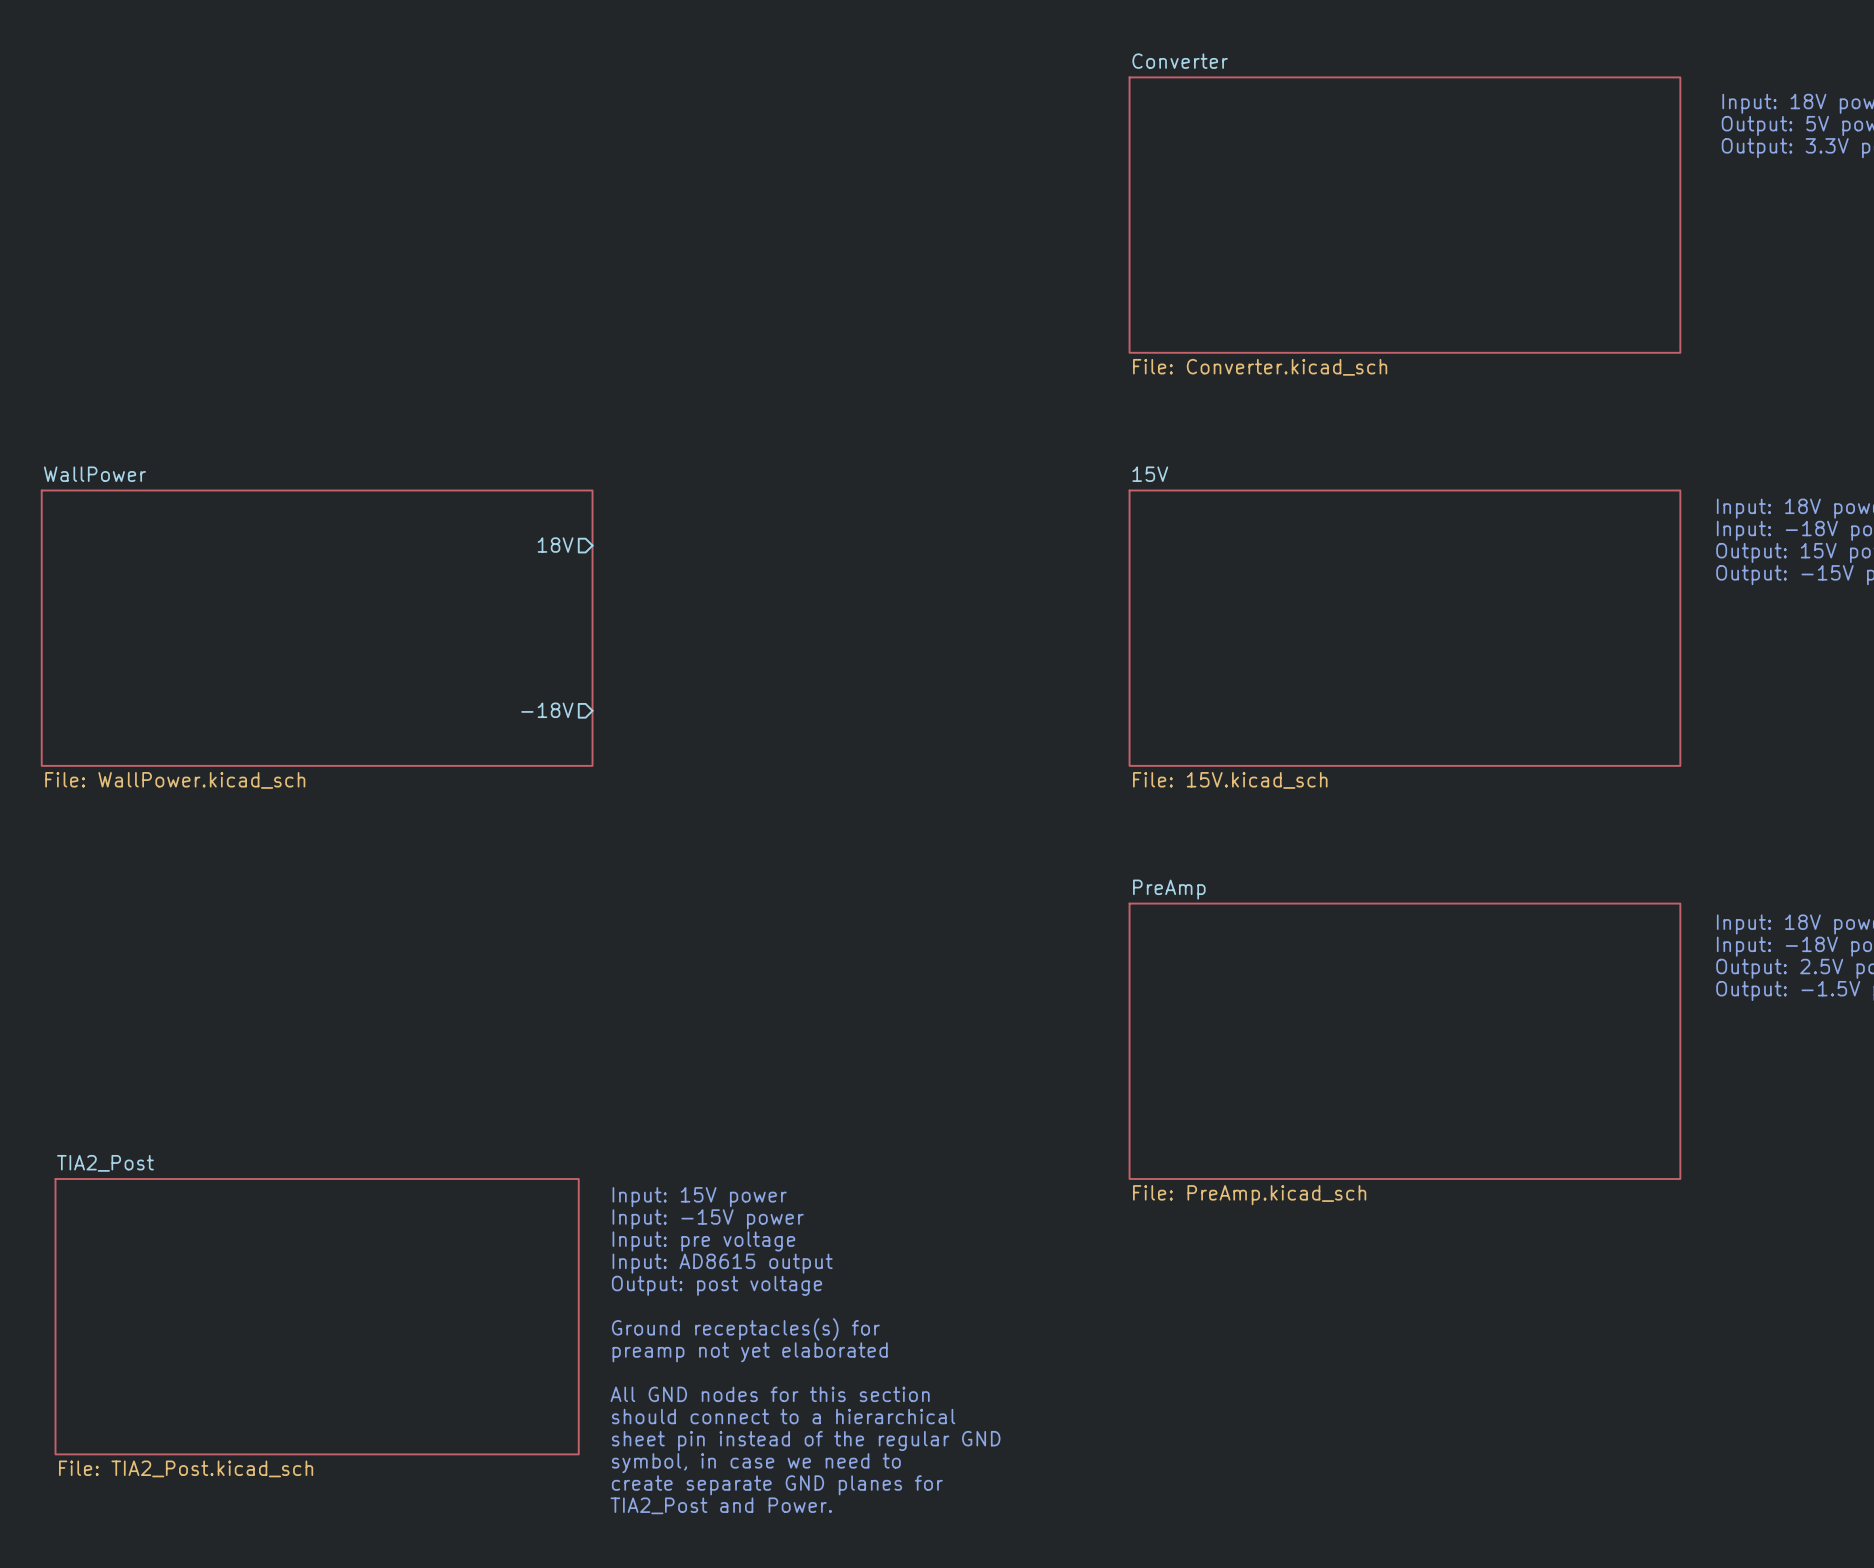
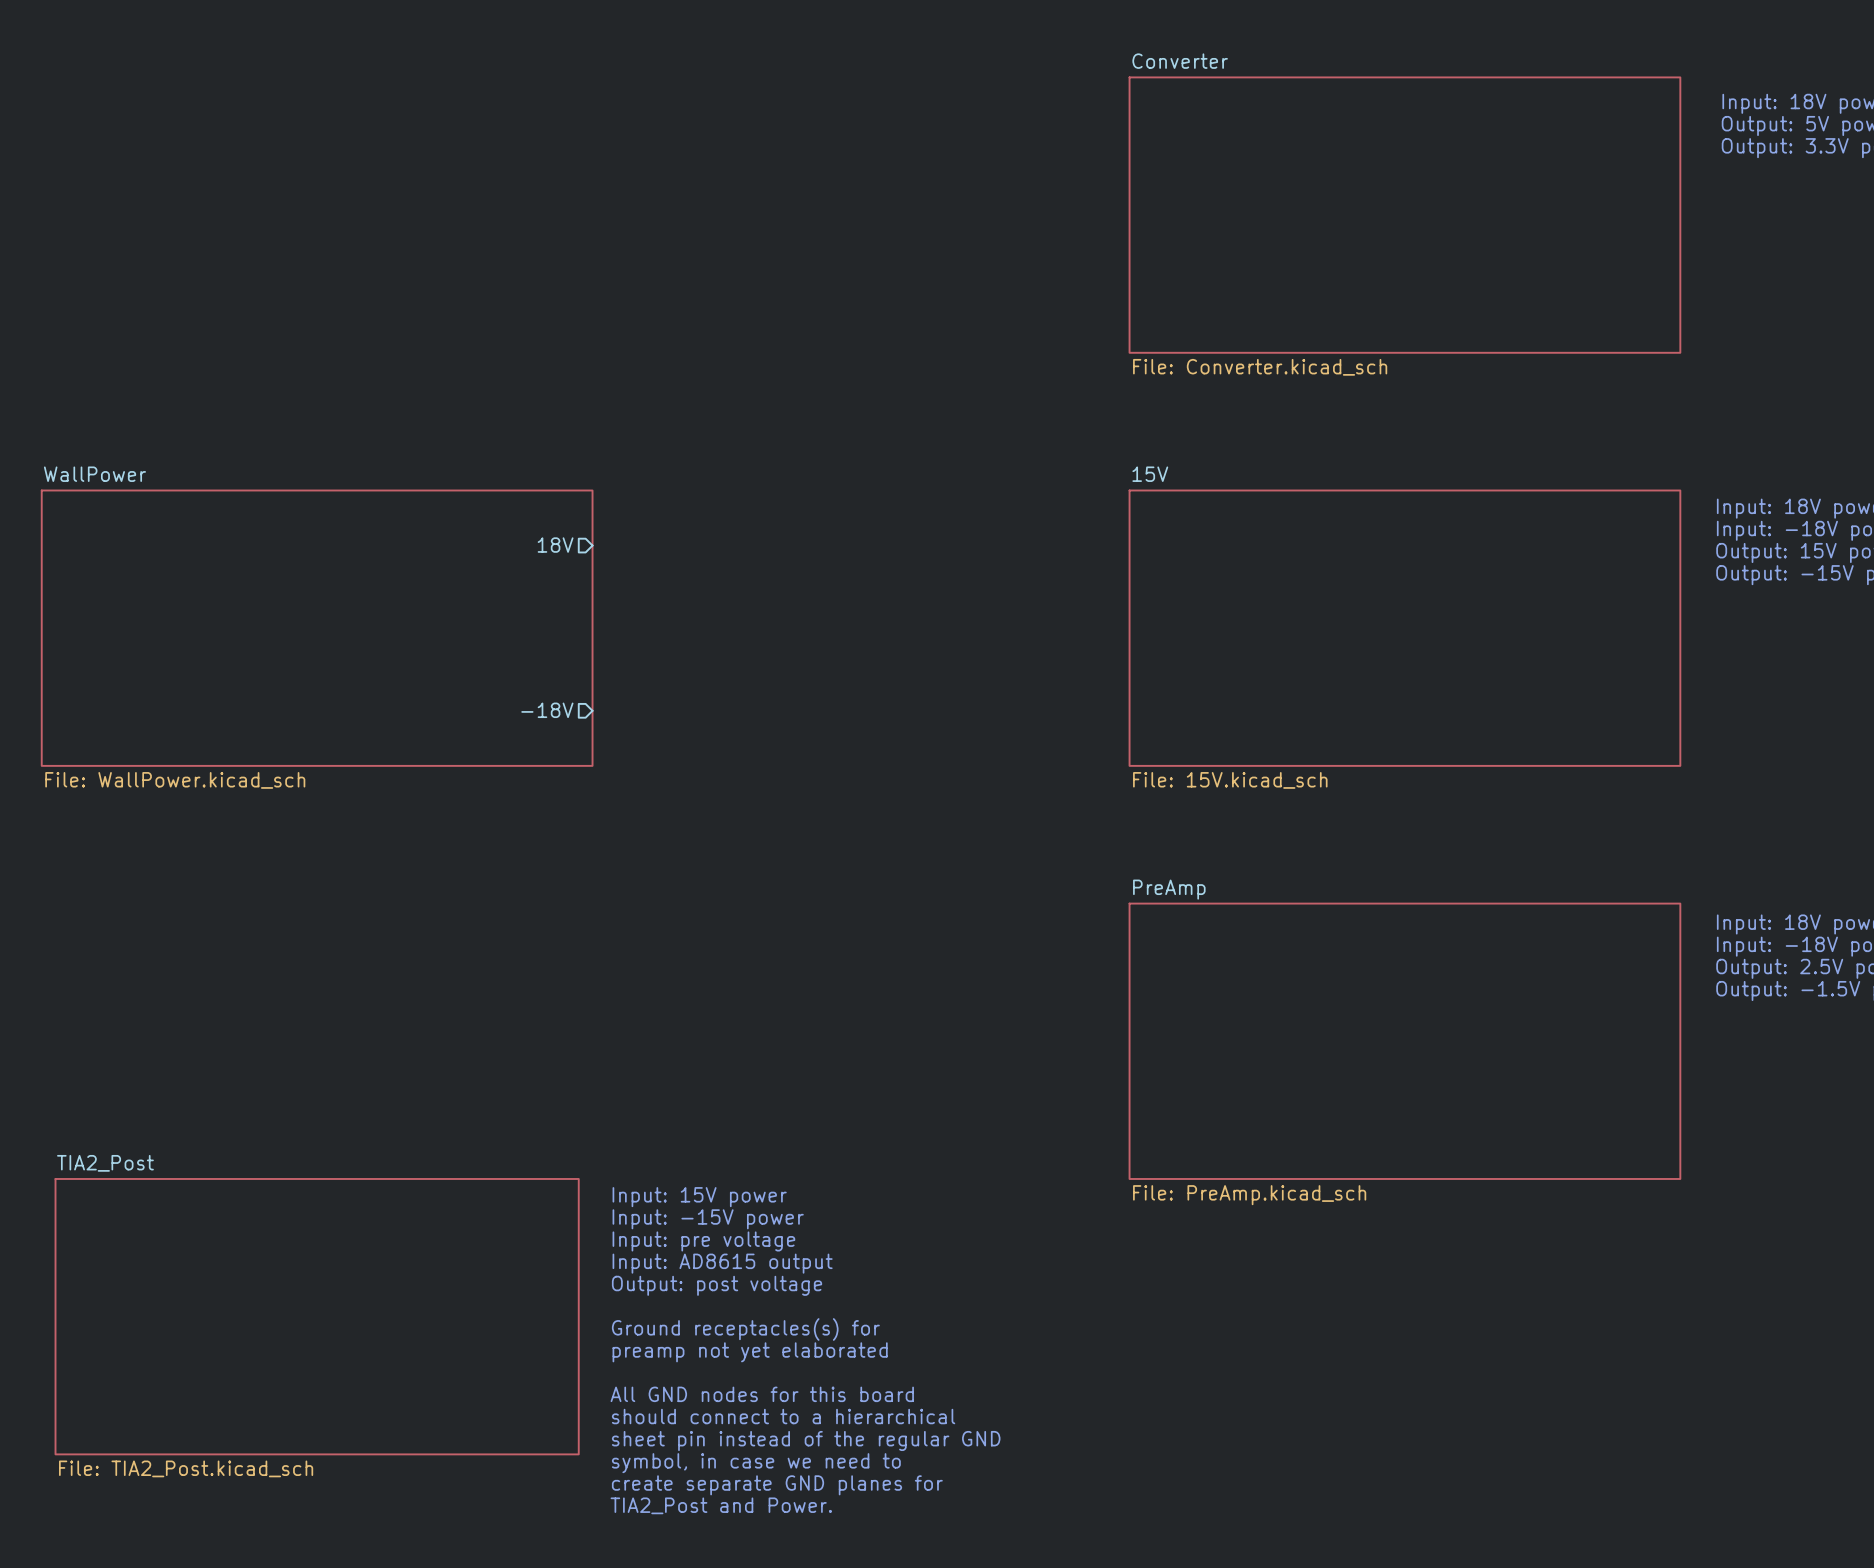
text: All GND nodes for this section (770, 1394) -> All GND nodes for this board (762, 1394)

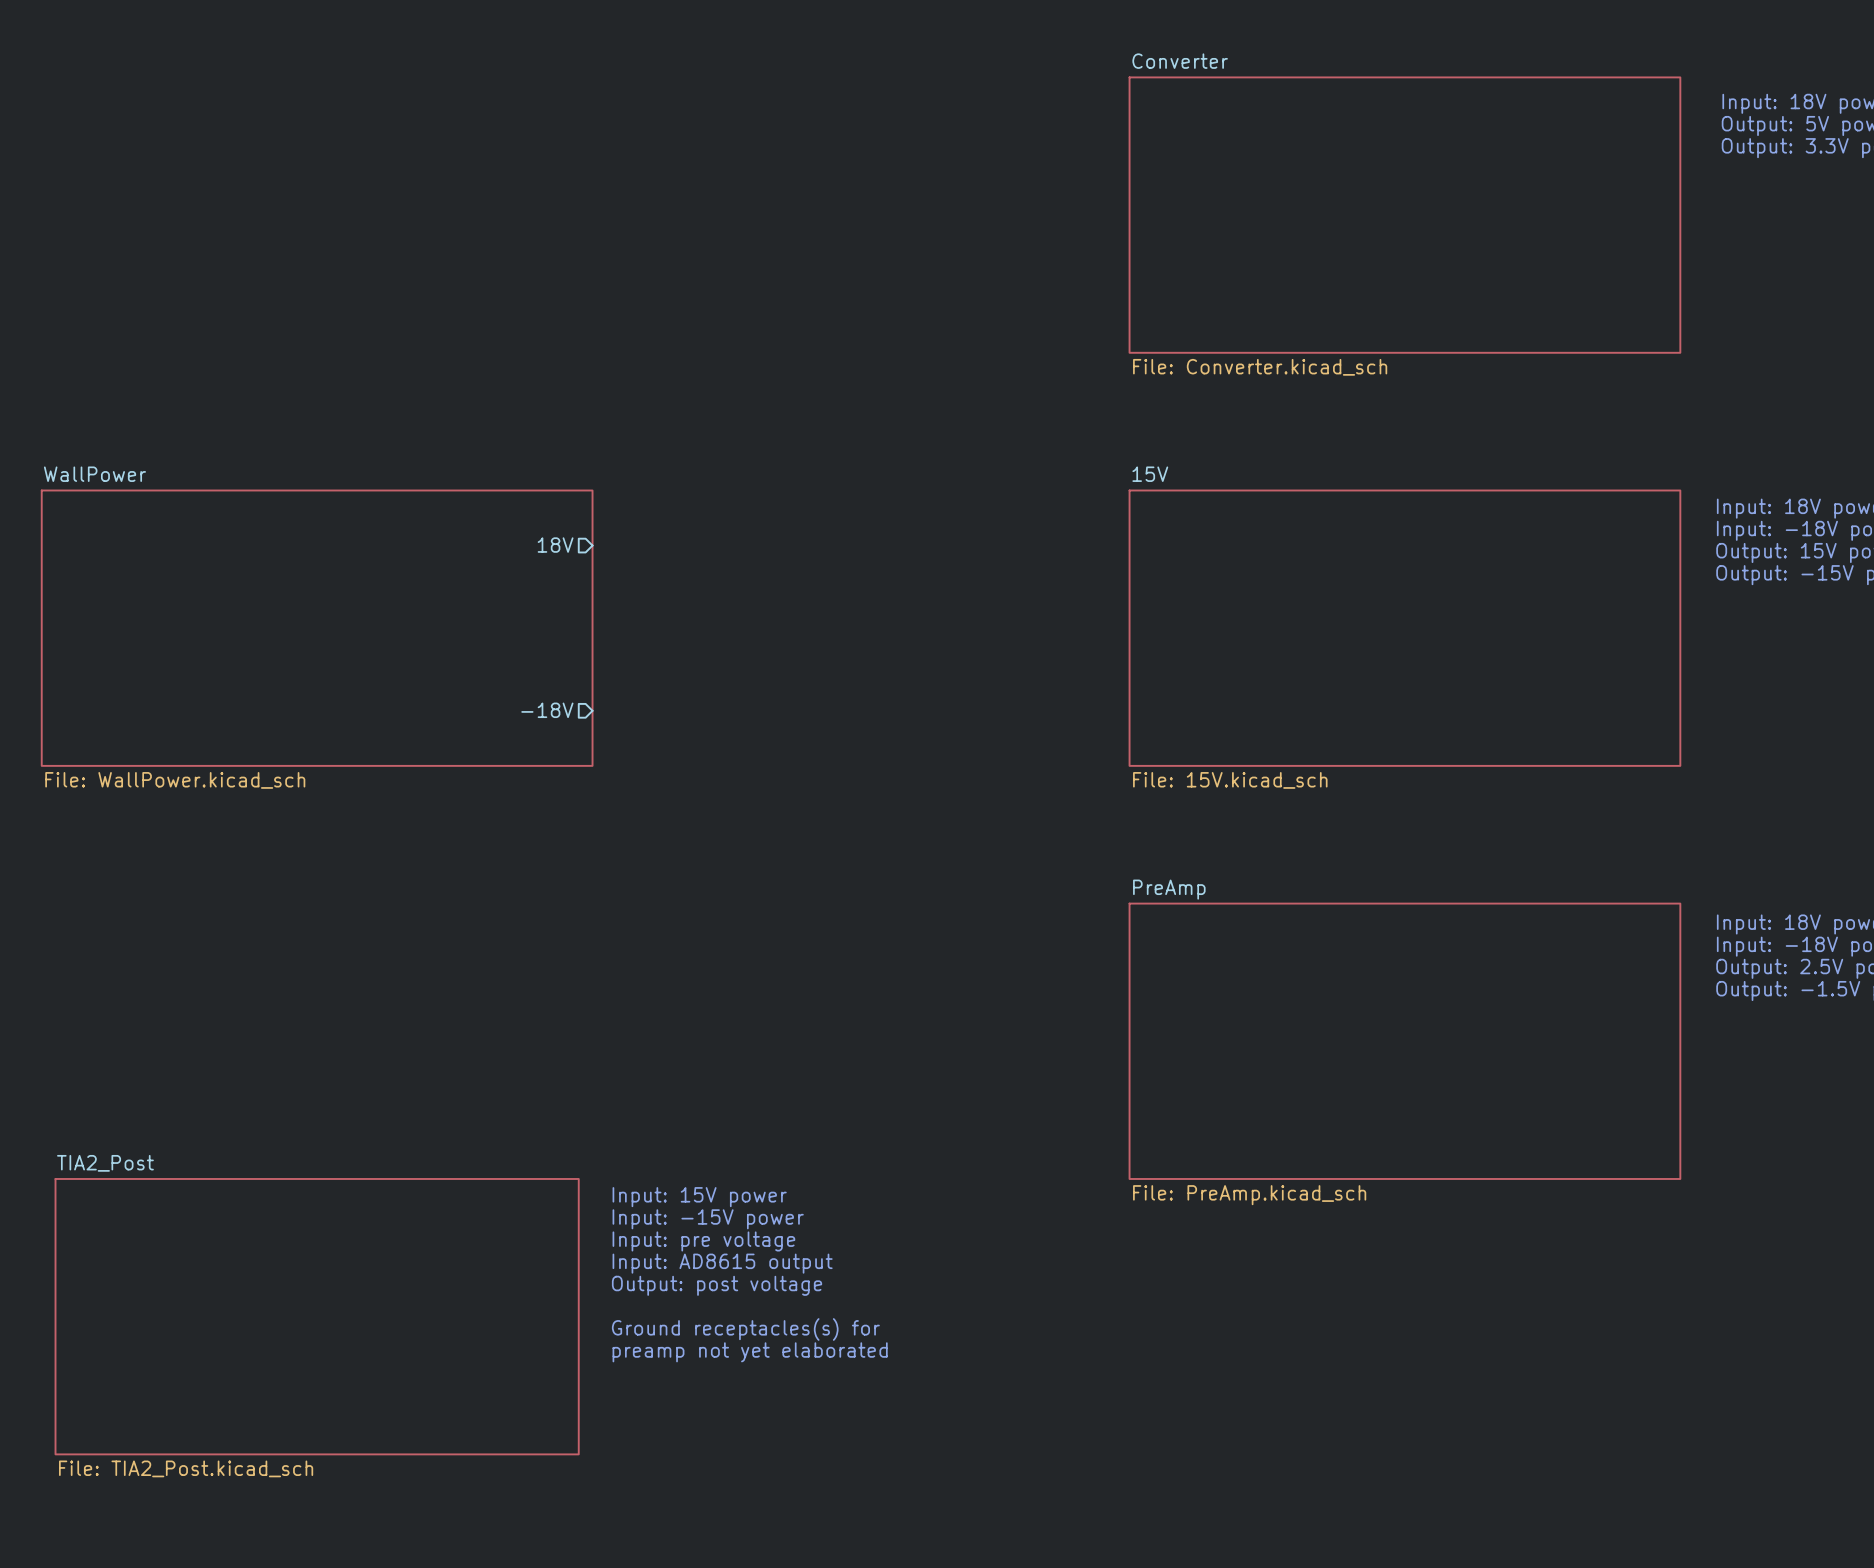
text: All GND nodes for this board (762, 1394) -> none
text: should connect to a hierarchical (783, 1416) -> none
text: sheet pin instead of the regular GND (806, 1440) -> none
text: symbol, in case we need to (756, 1463) -> none
text: create separate GND planes for (777, 1485) -> none
text: TIA2_Post and Power. (721, 1505) -> none

